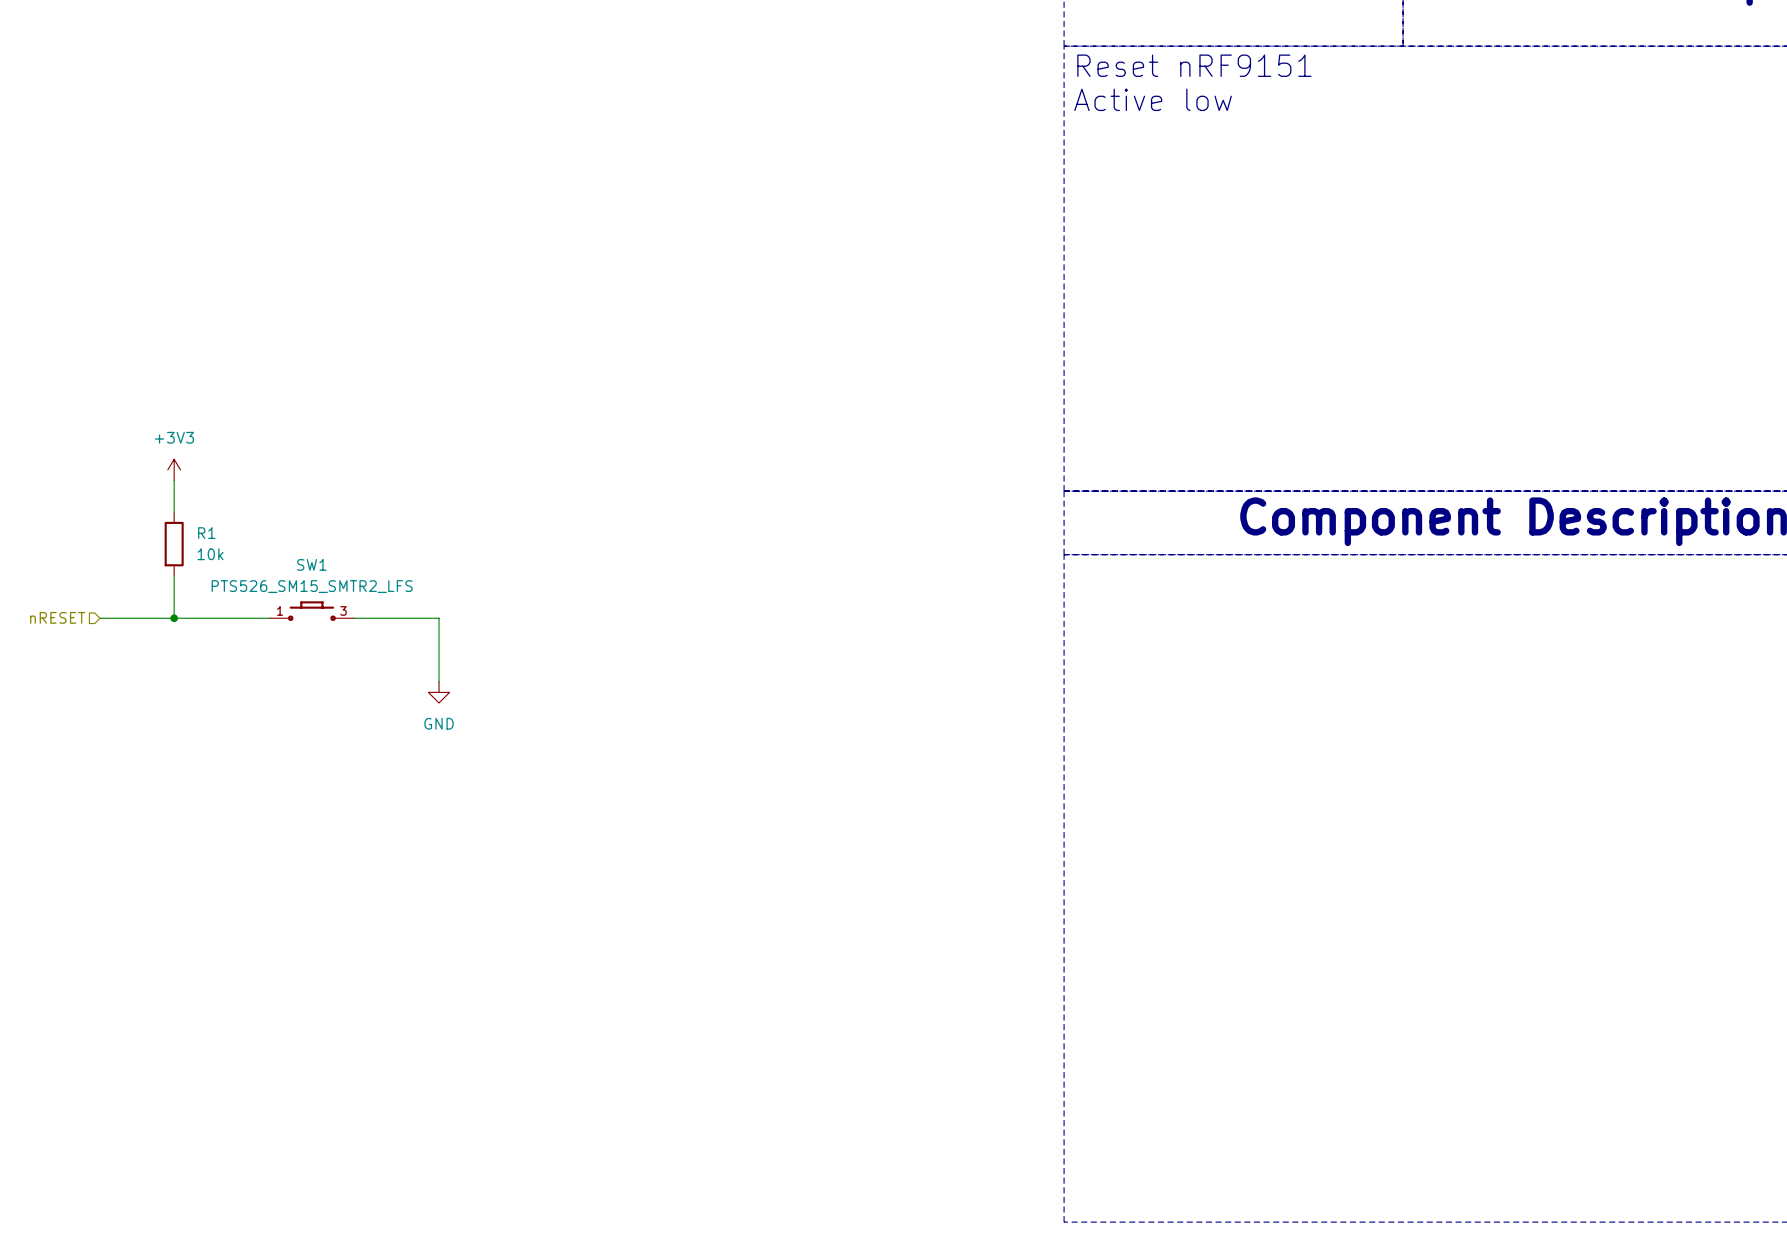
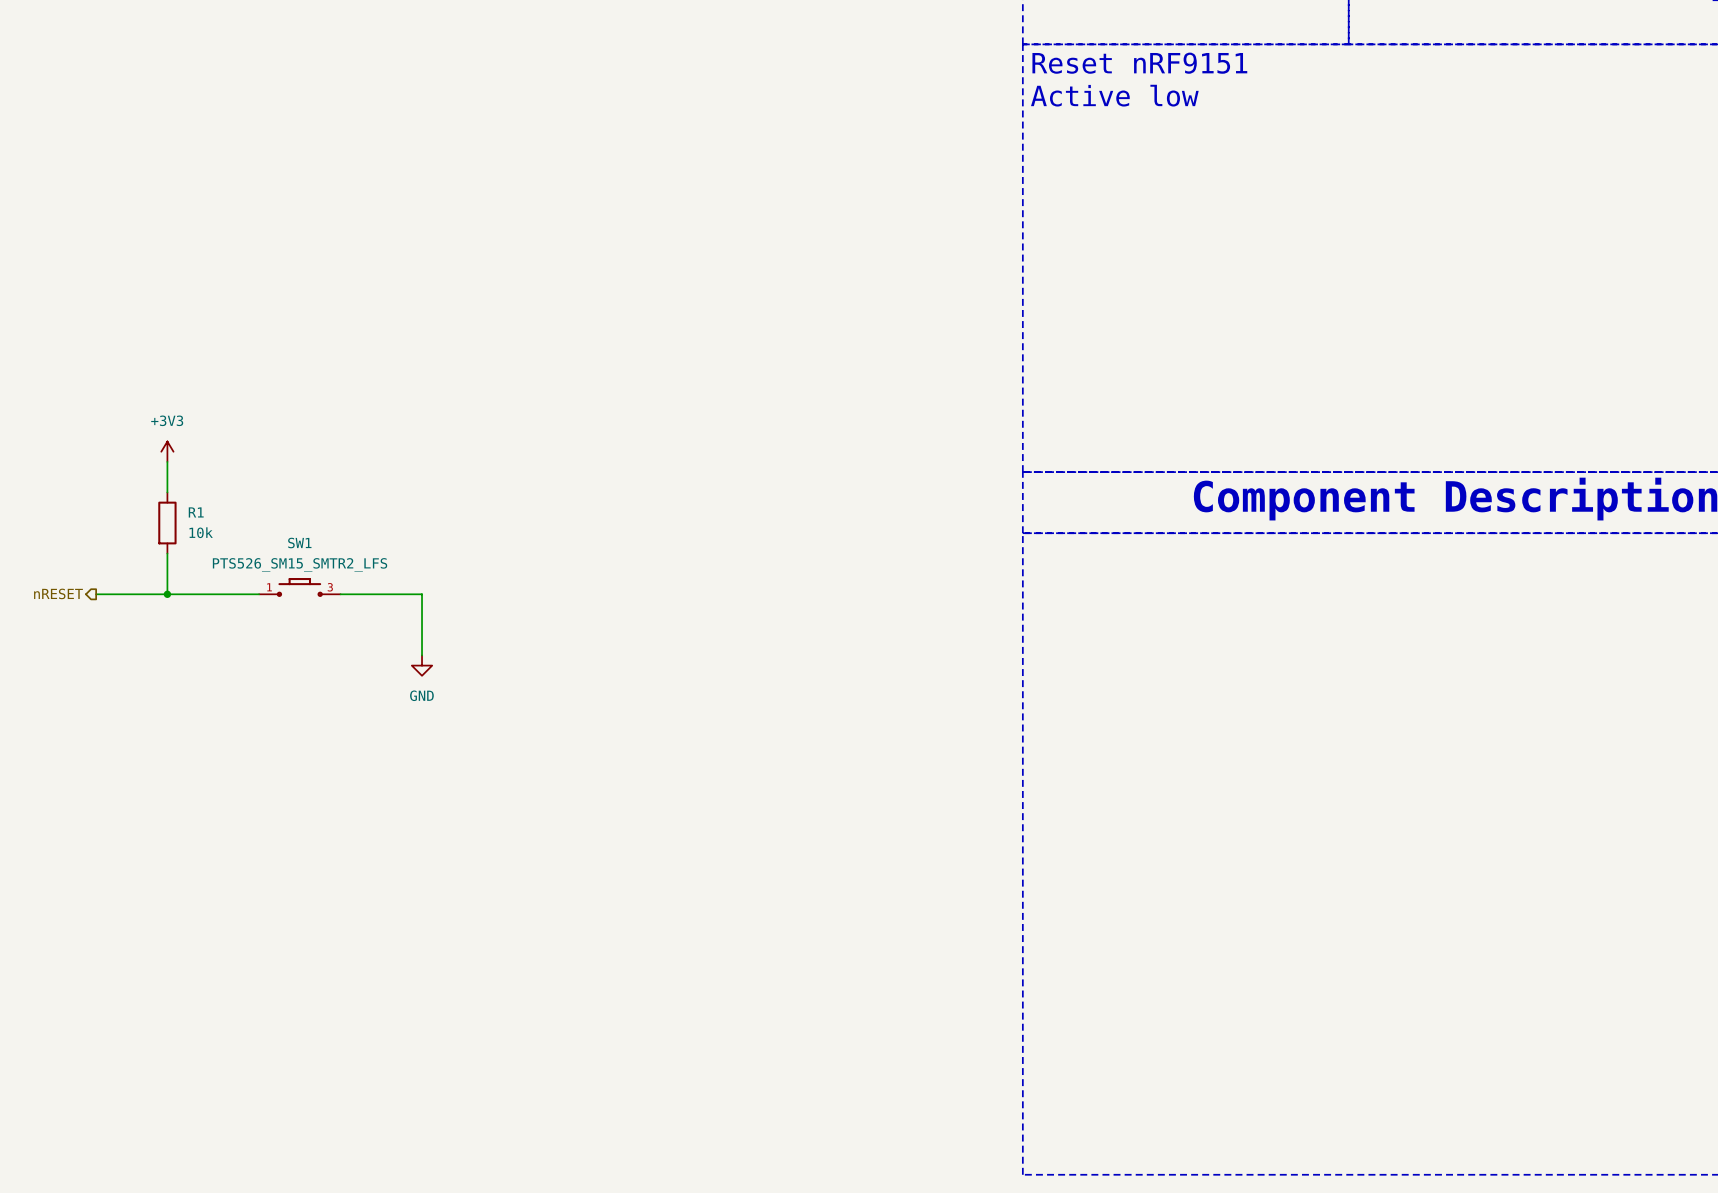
hierarchical label shape: input (57, 617) -> output (58, 593)

